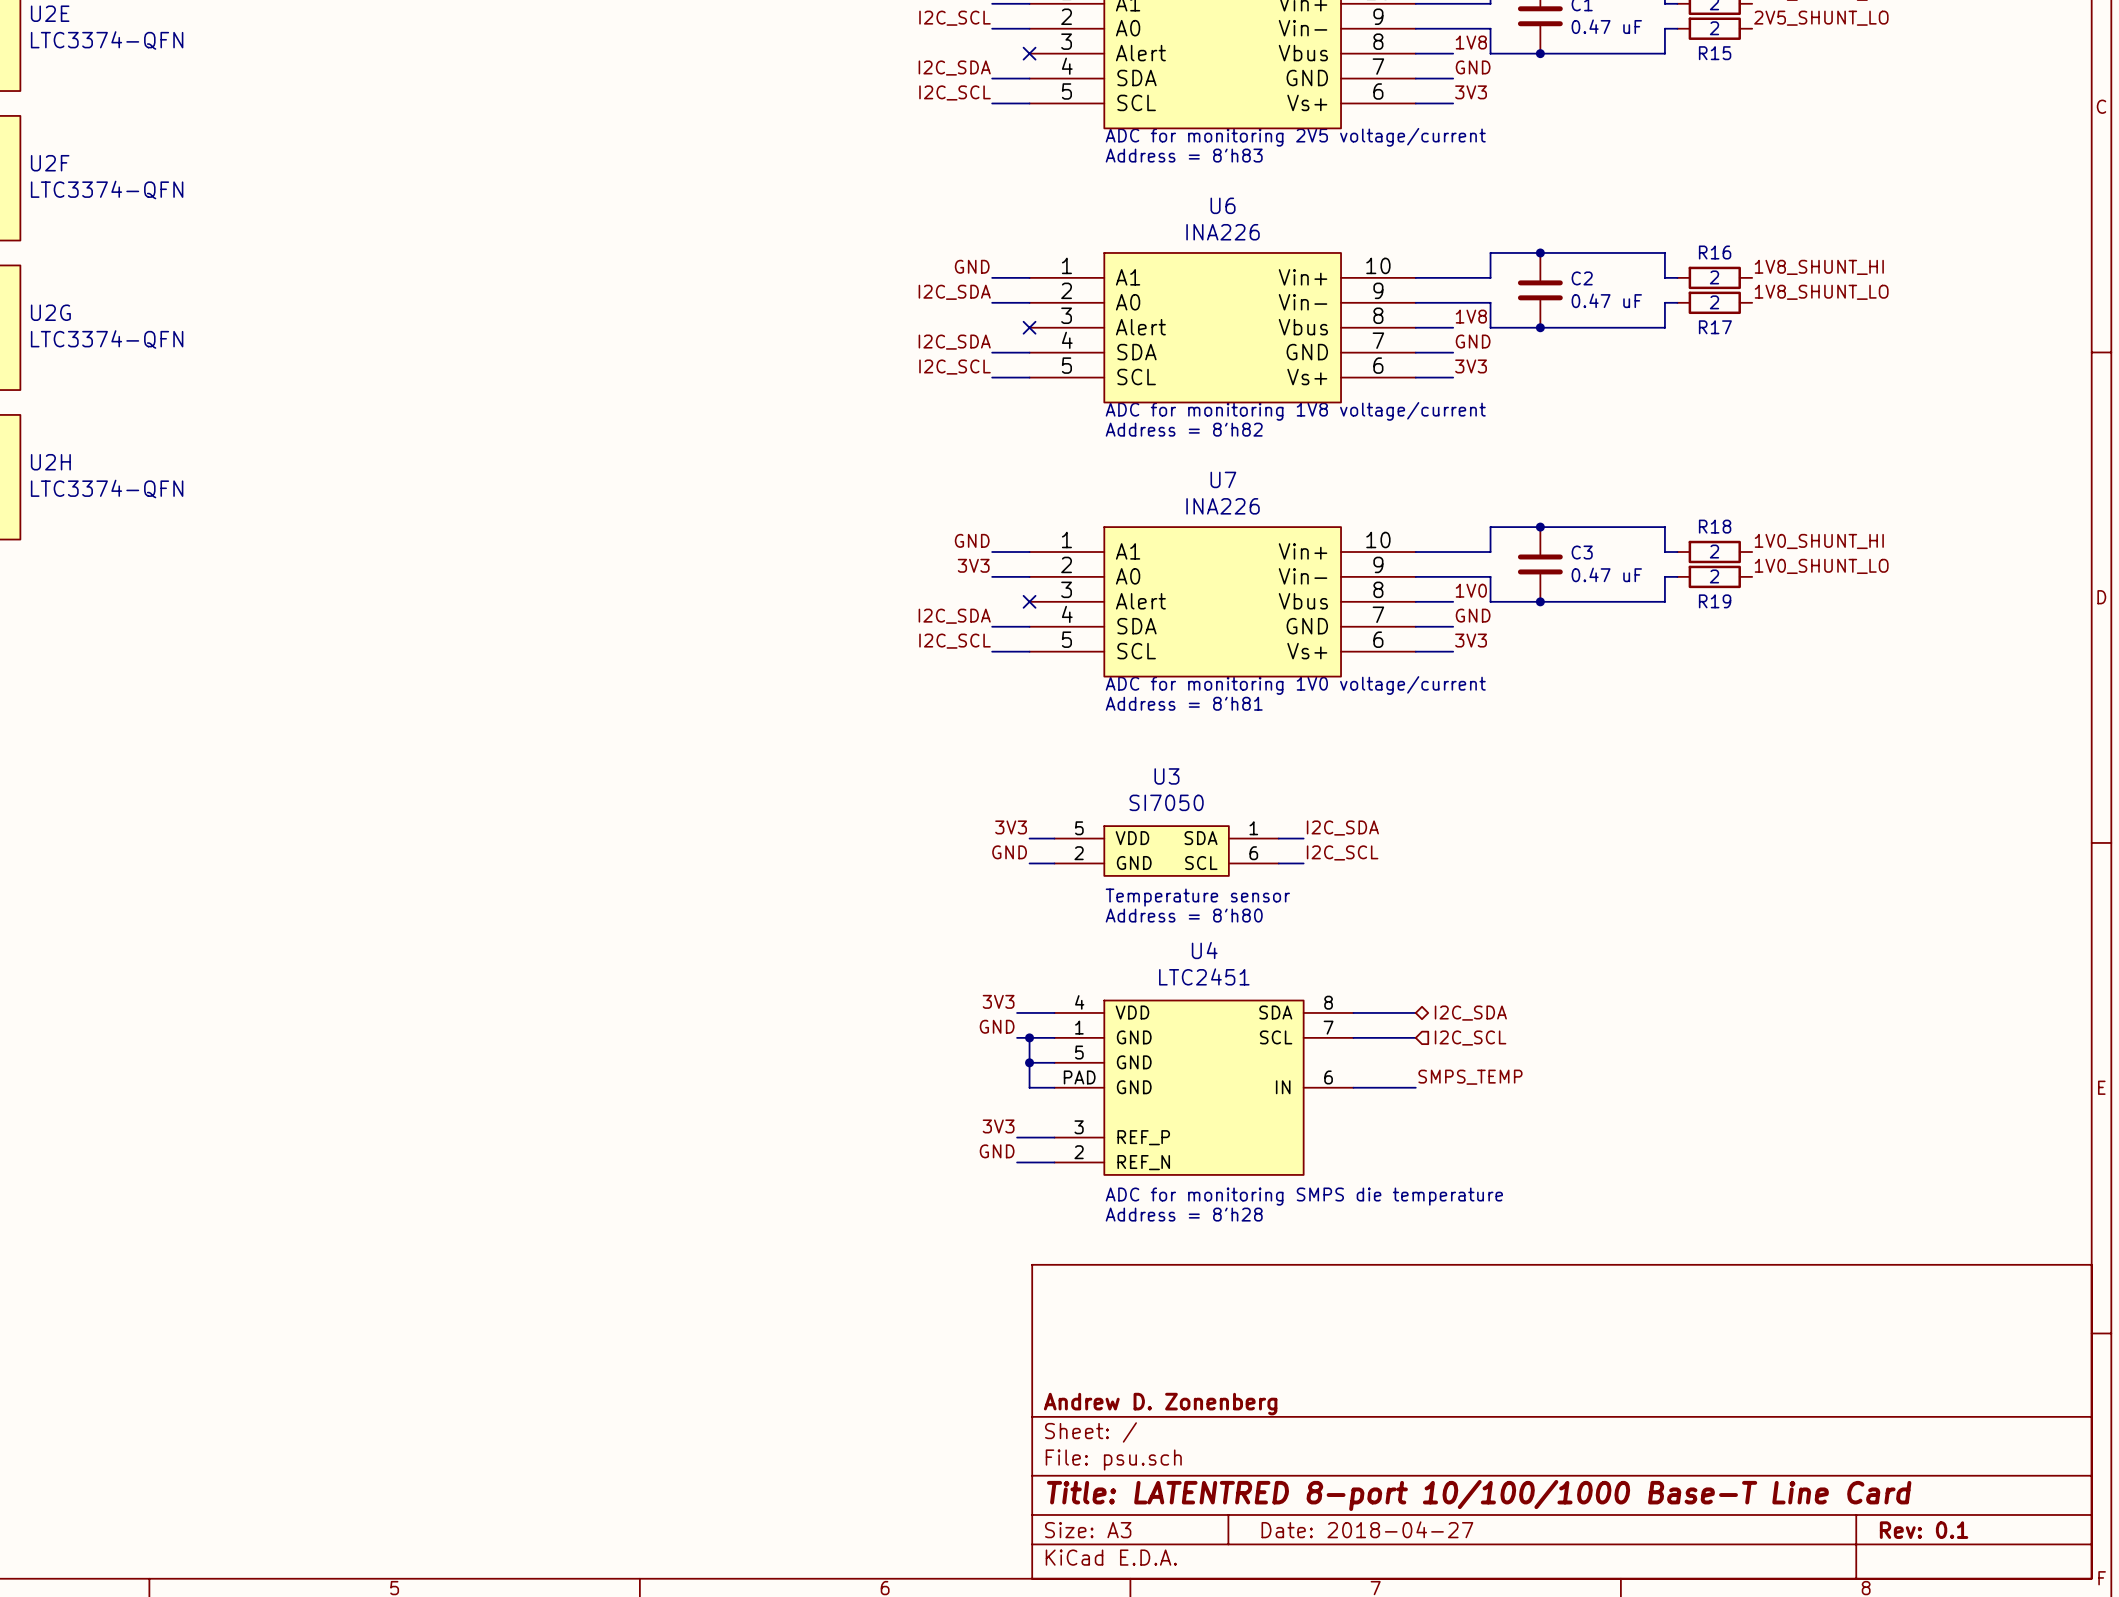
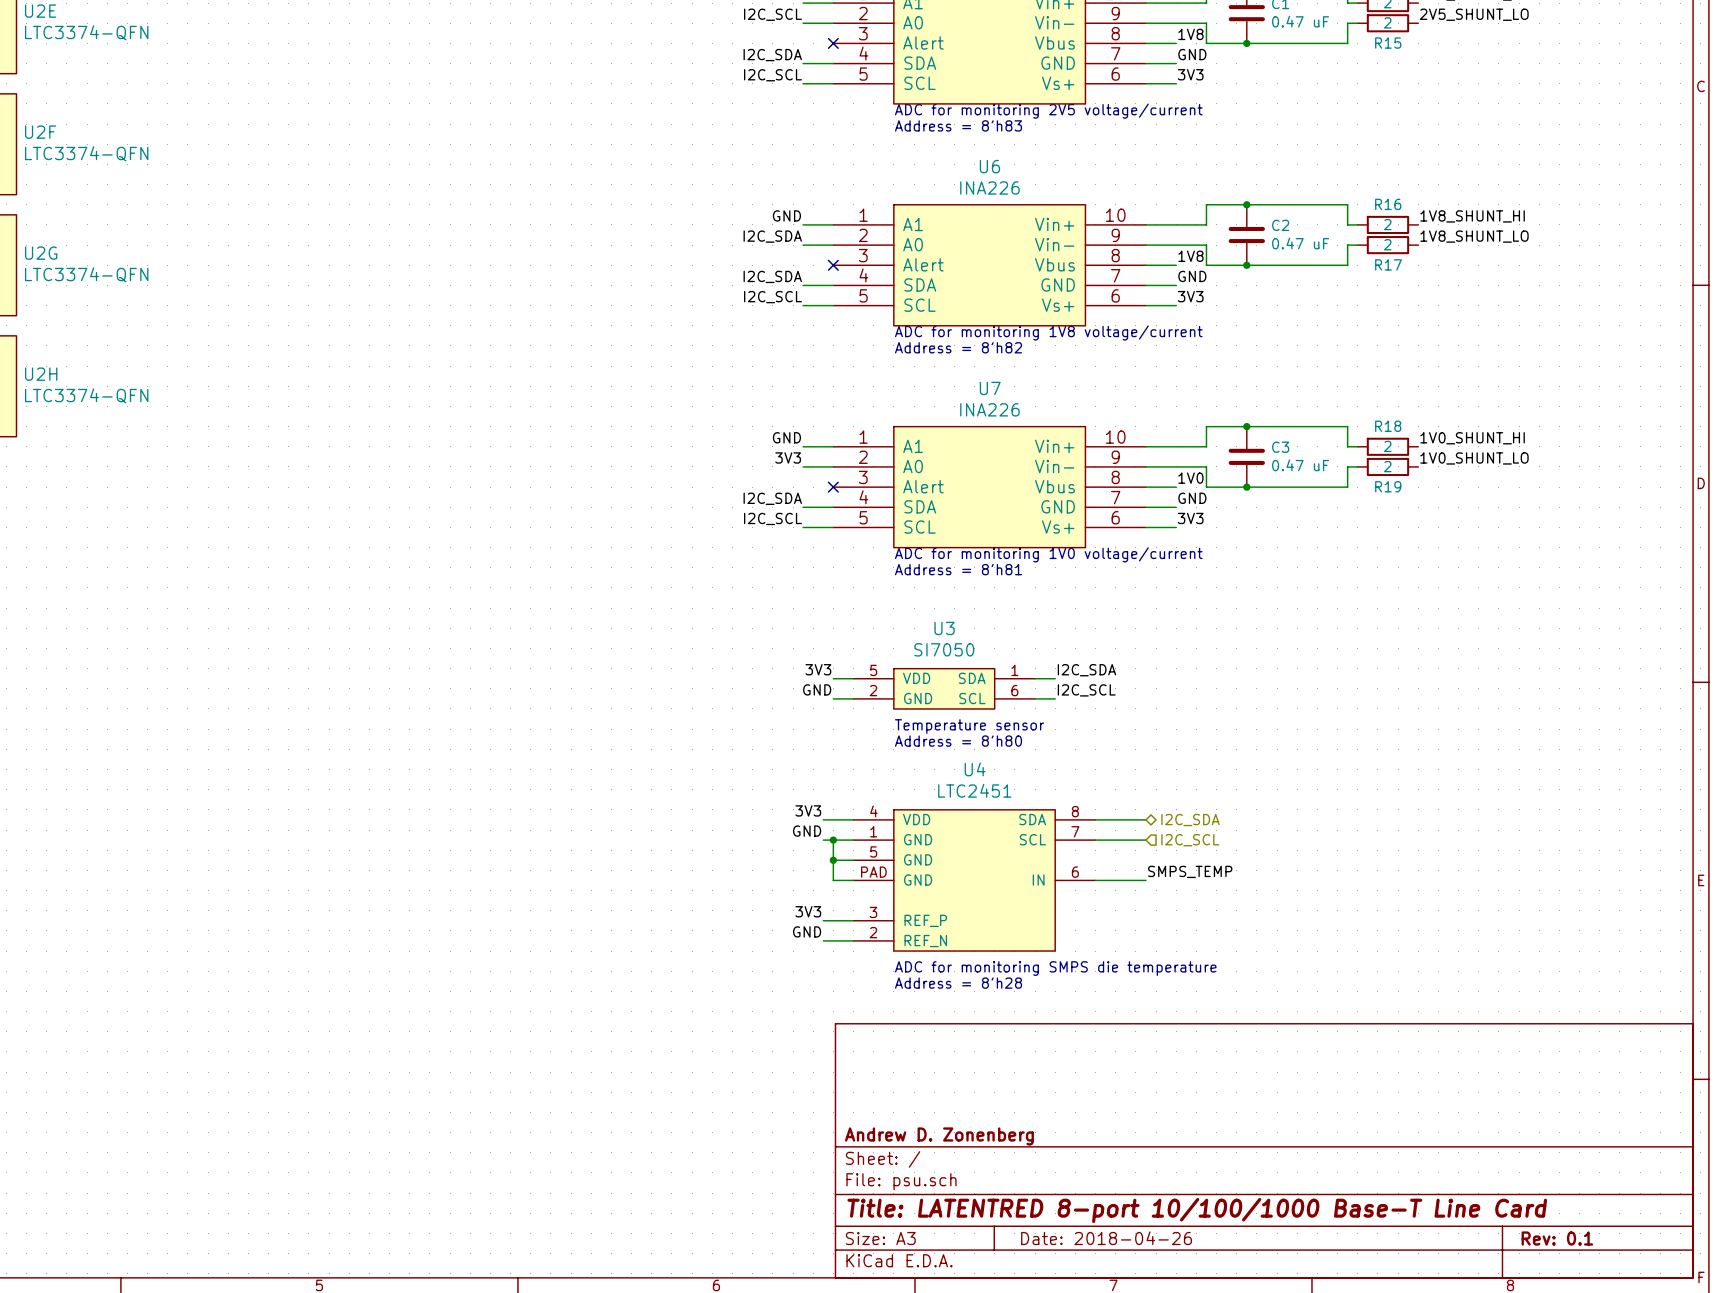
title block: Date: 2018-04-27 (1367, 1529) -> Date: 2018-04-26 (1106, 1238)

